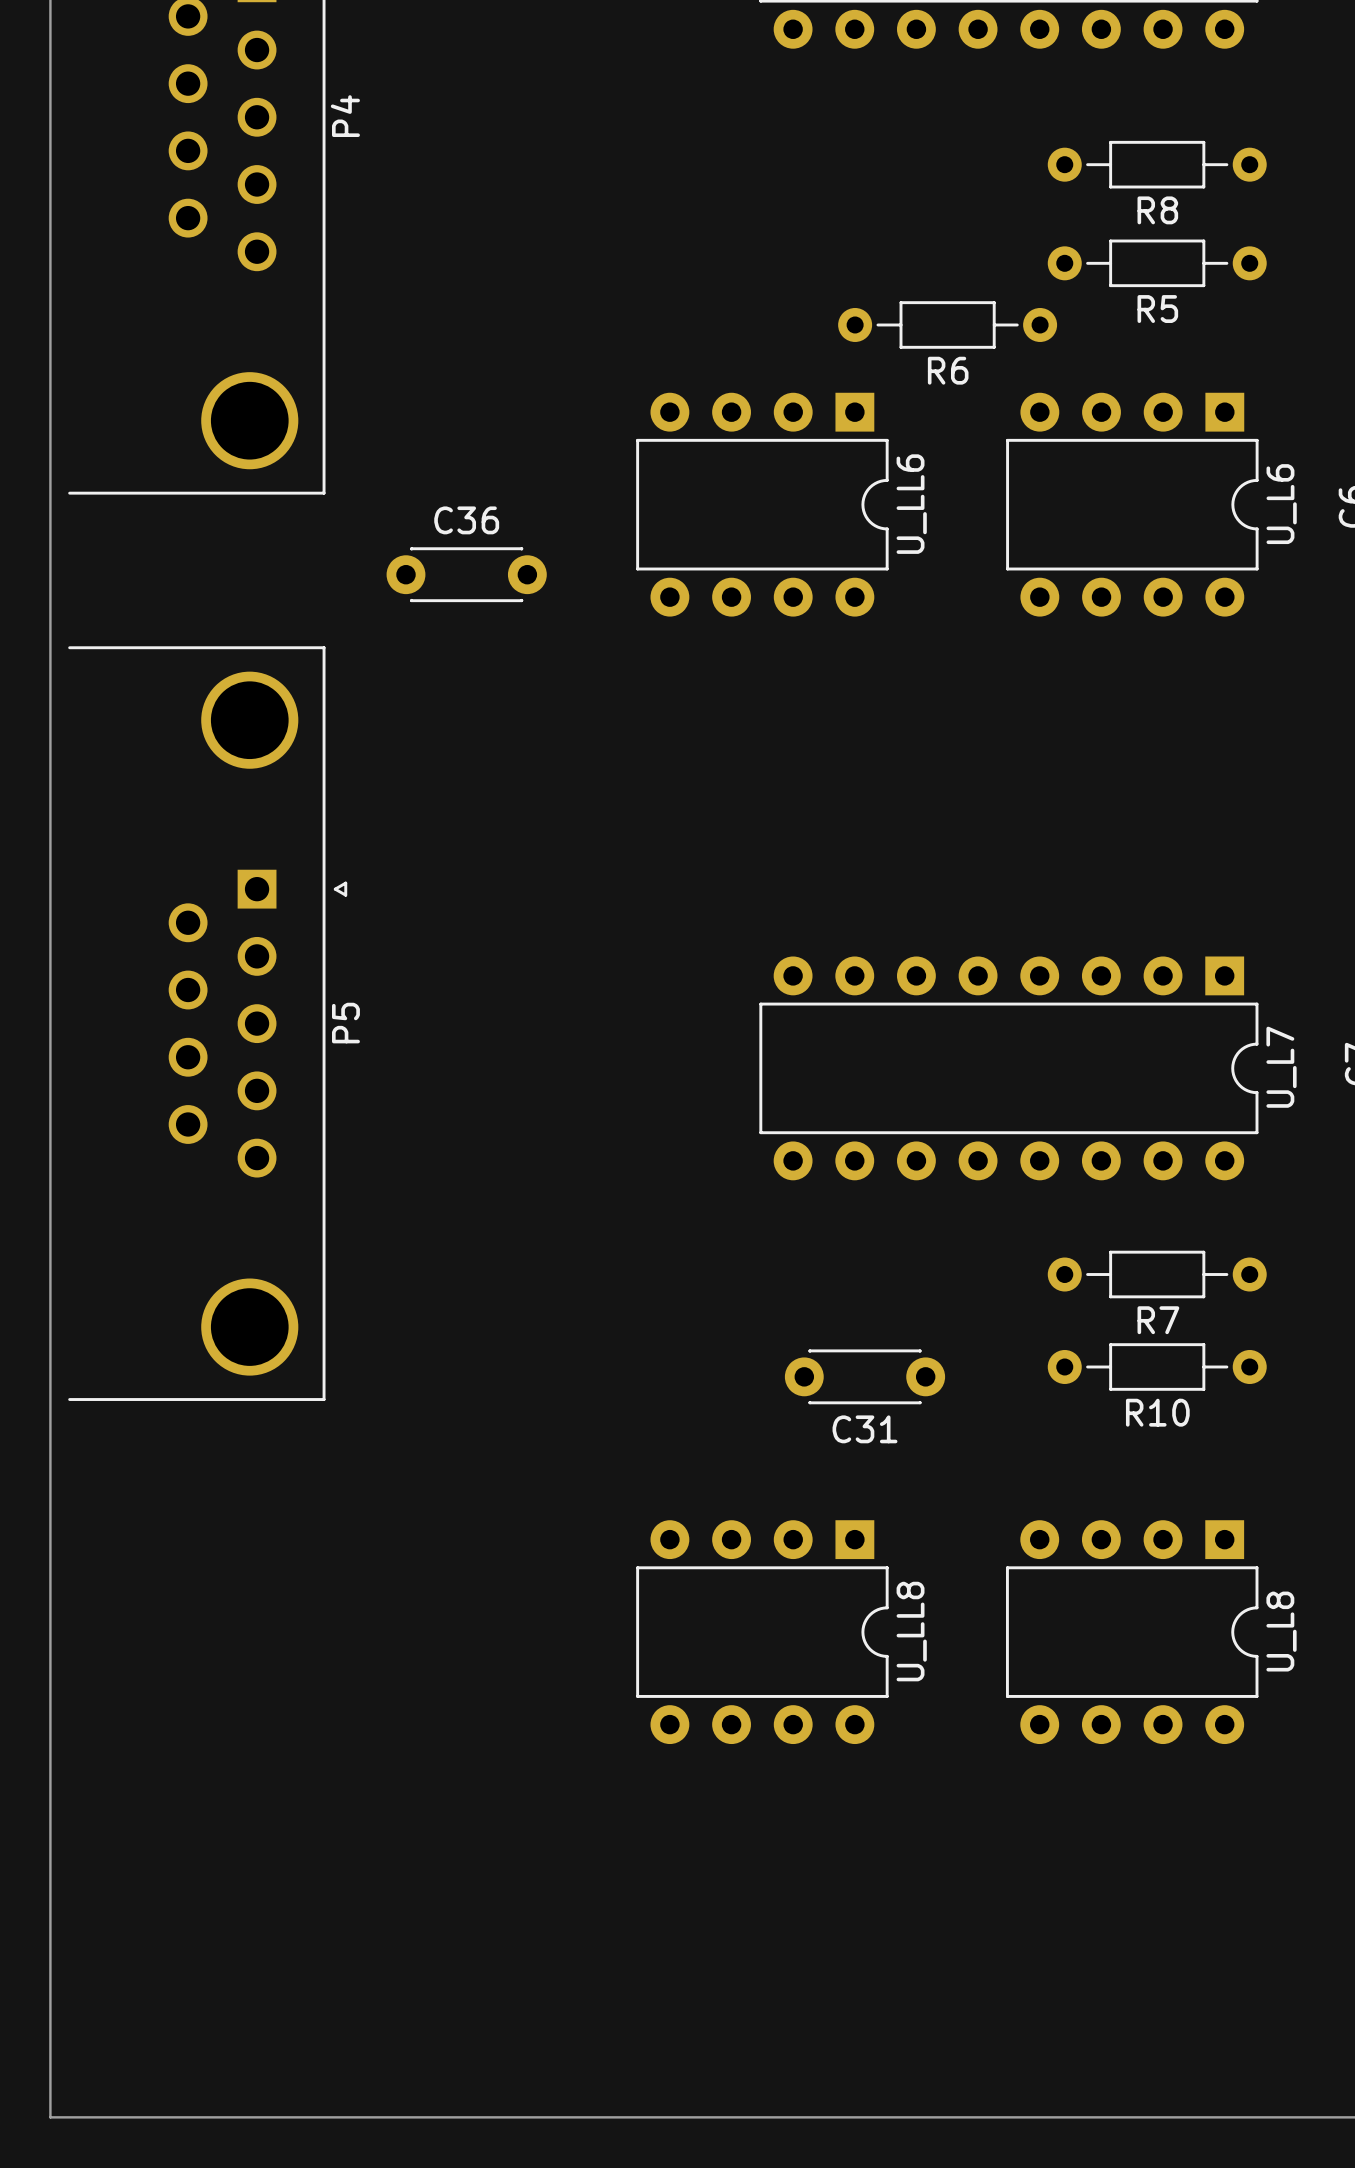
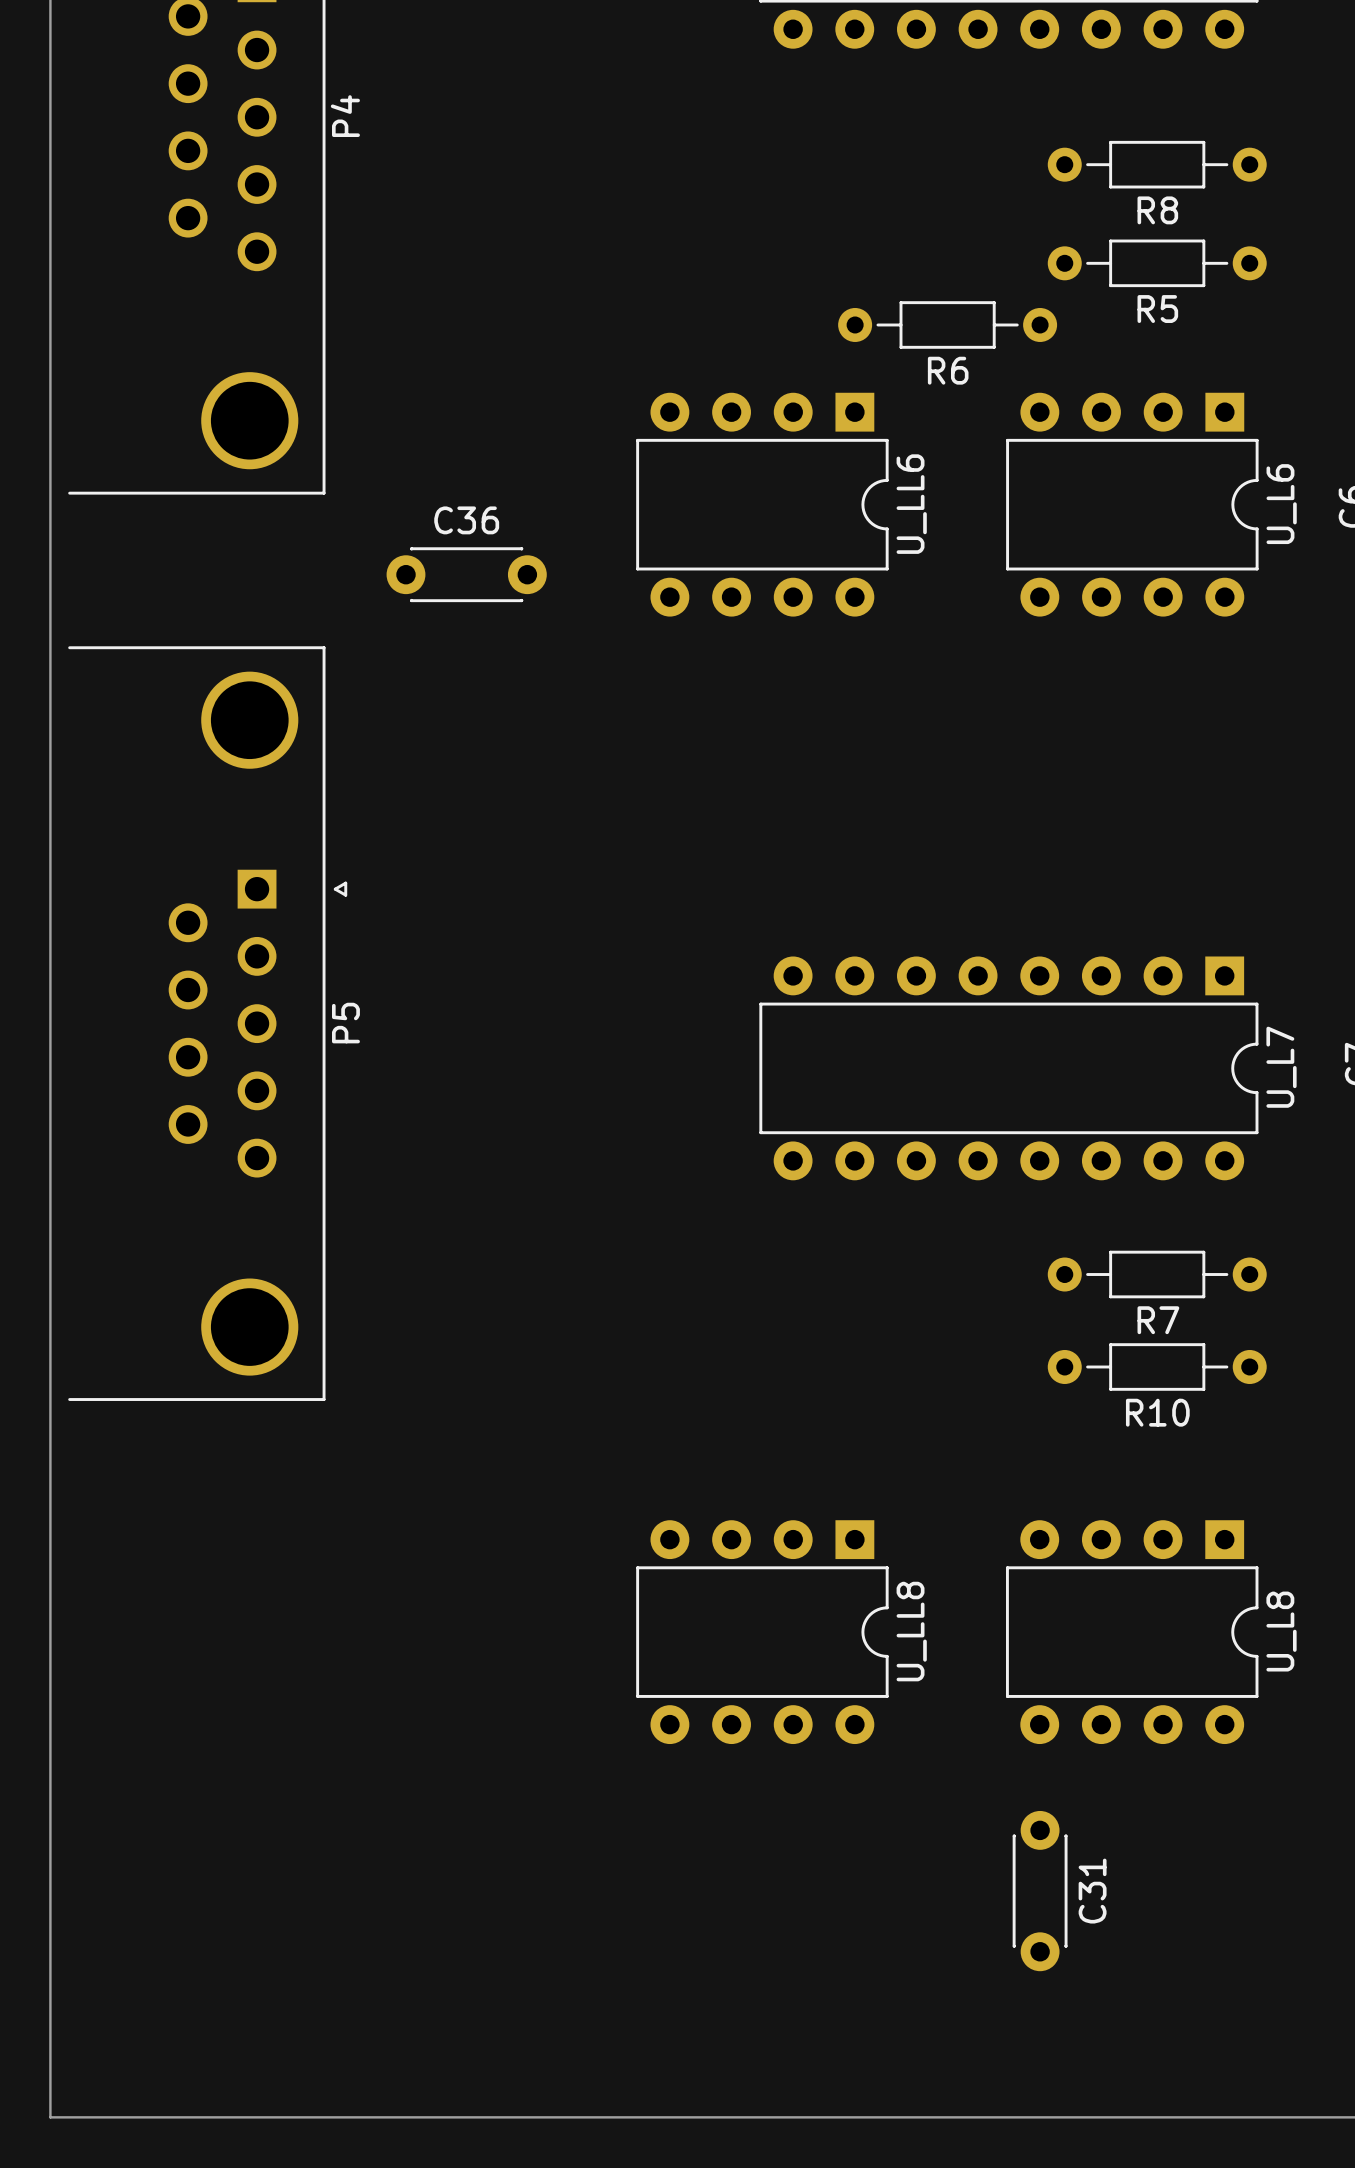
C31 rotation: 0° (864, 1376) -> 90° clockwise (1040, 1891)
C31 position: (864, 1376) -> (1040, 1891)
C31 name position: C31 (864, 1429) -> C31 (1092, 1891)

